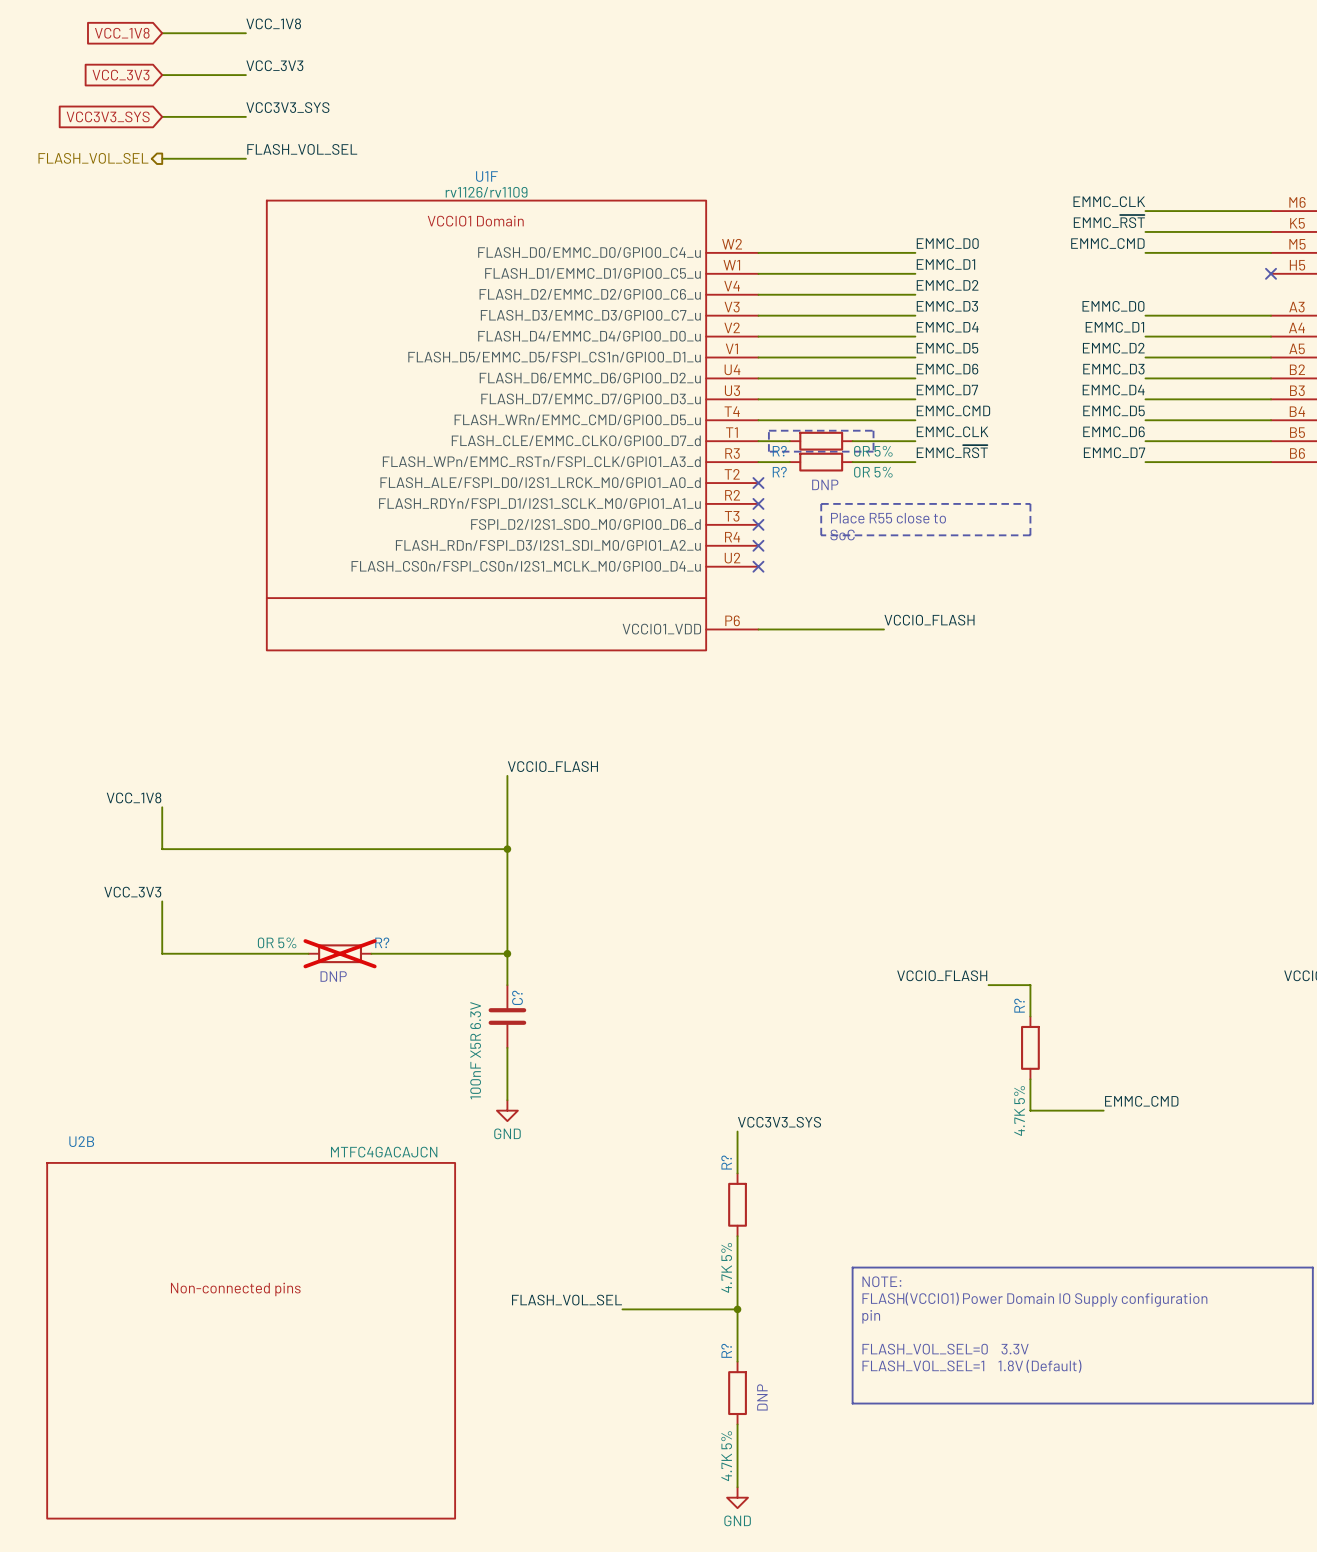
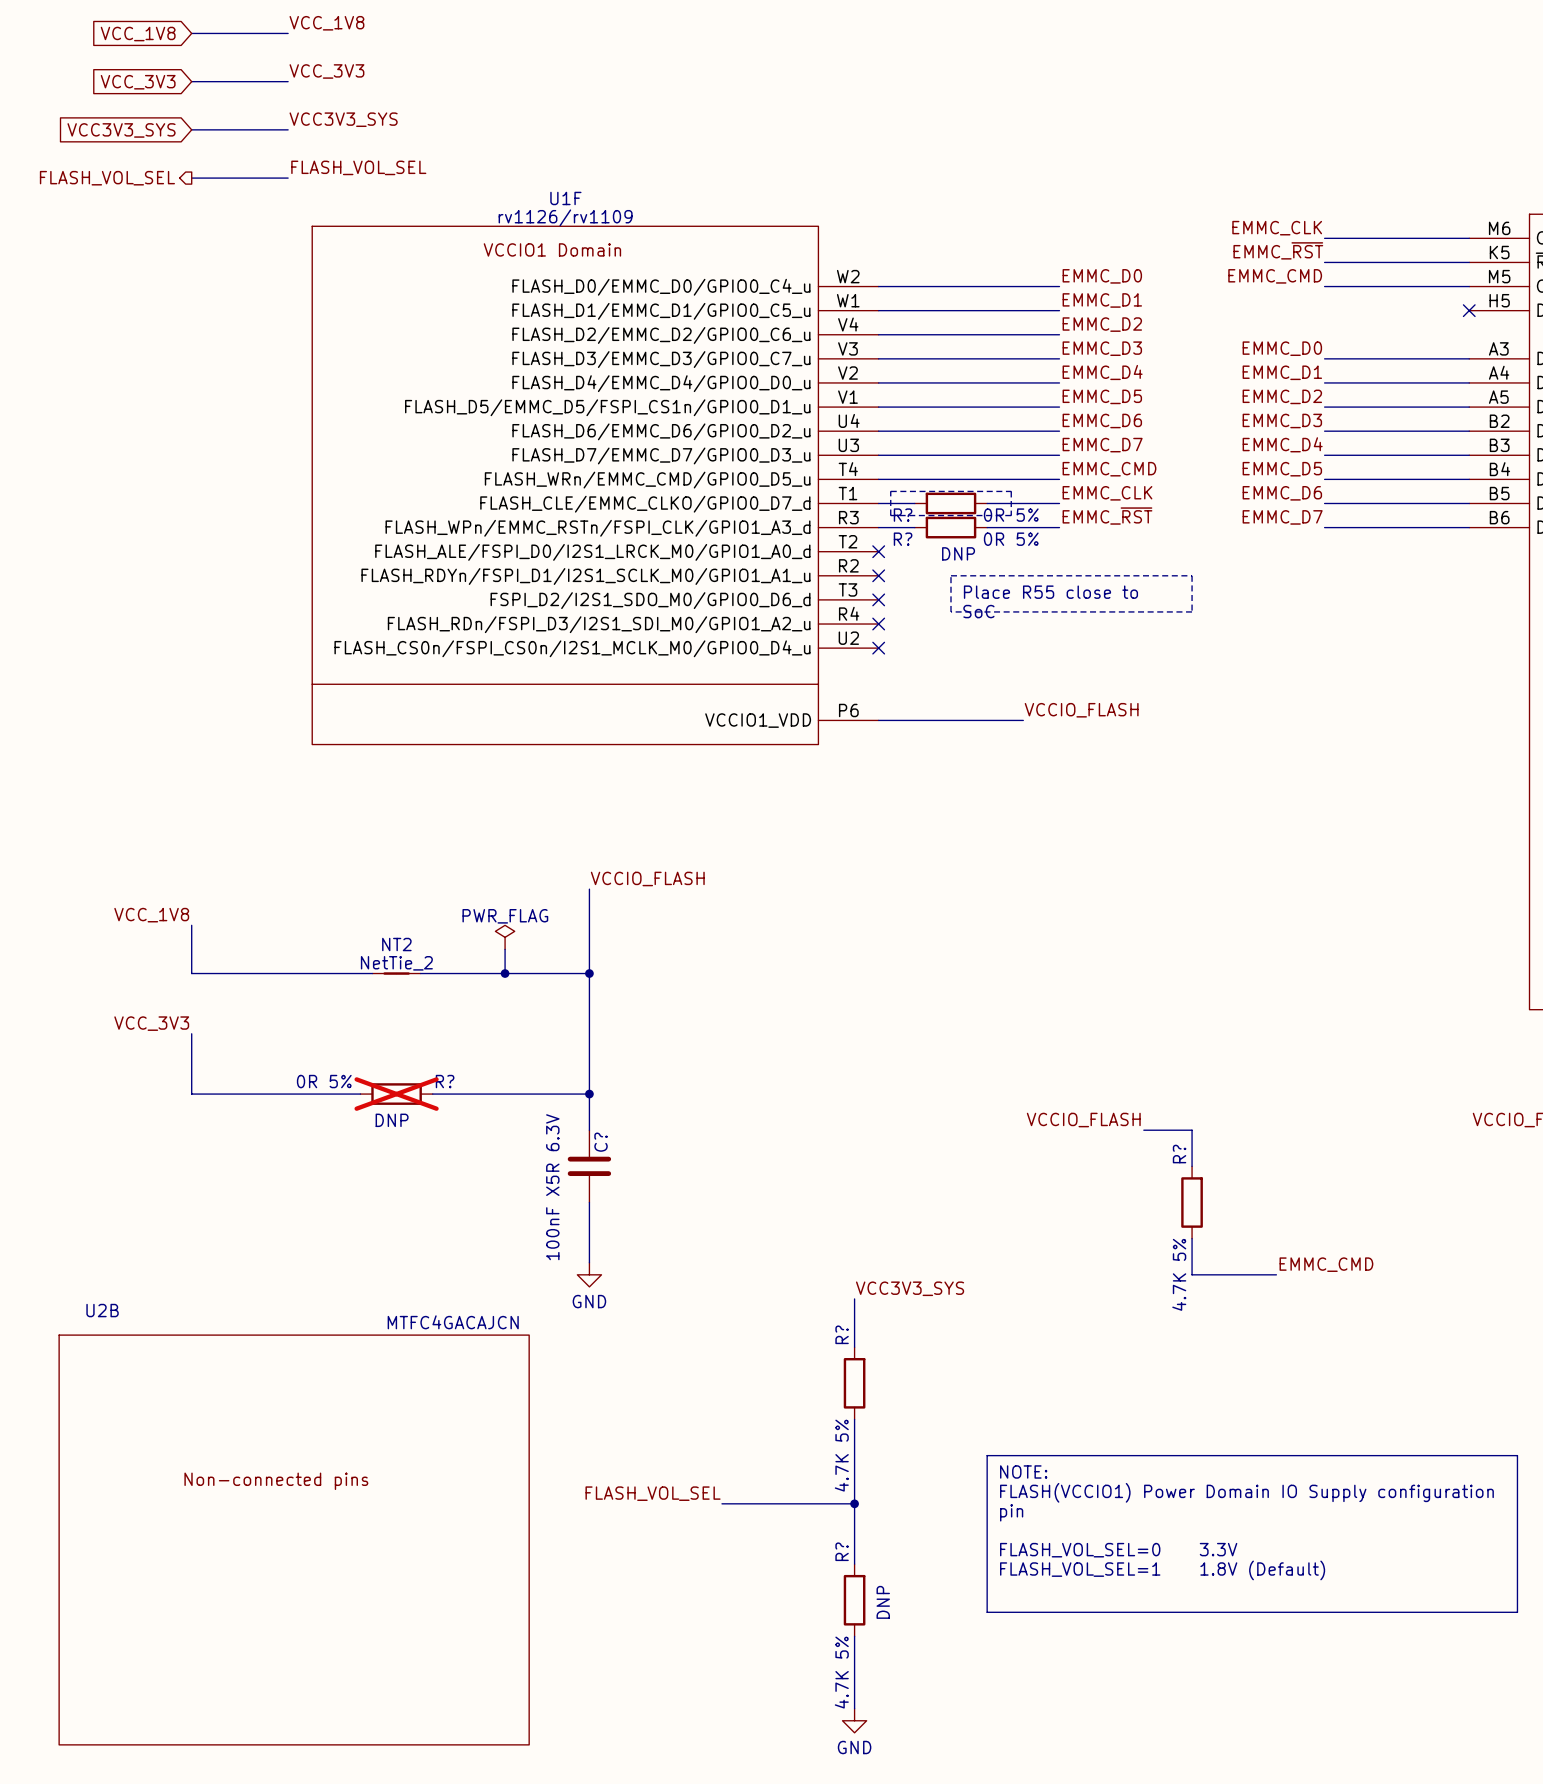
power symbol: none -> PWR_FLAG (505, 937)
wire: none -> (505, 949) (505, 973)
NT2: none -> NetTie_2 (396, 973)
junction: none -> (505, 973)

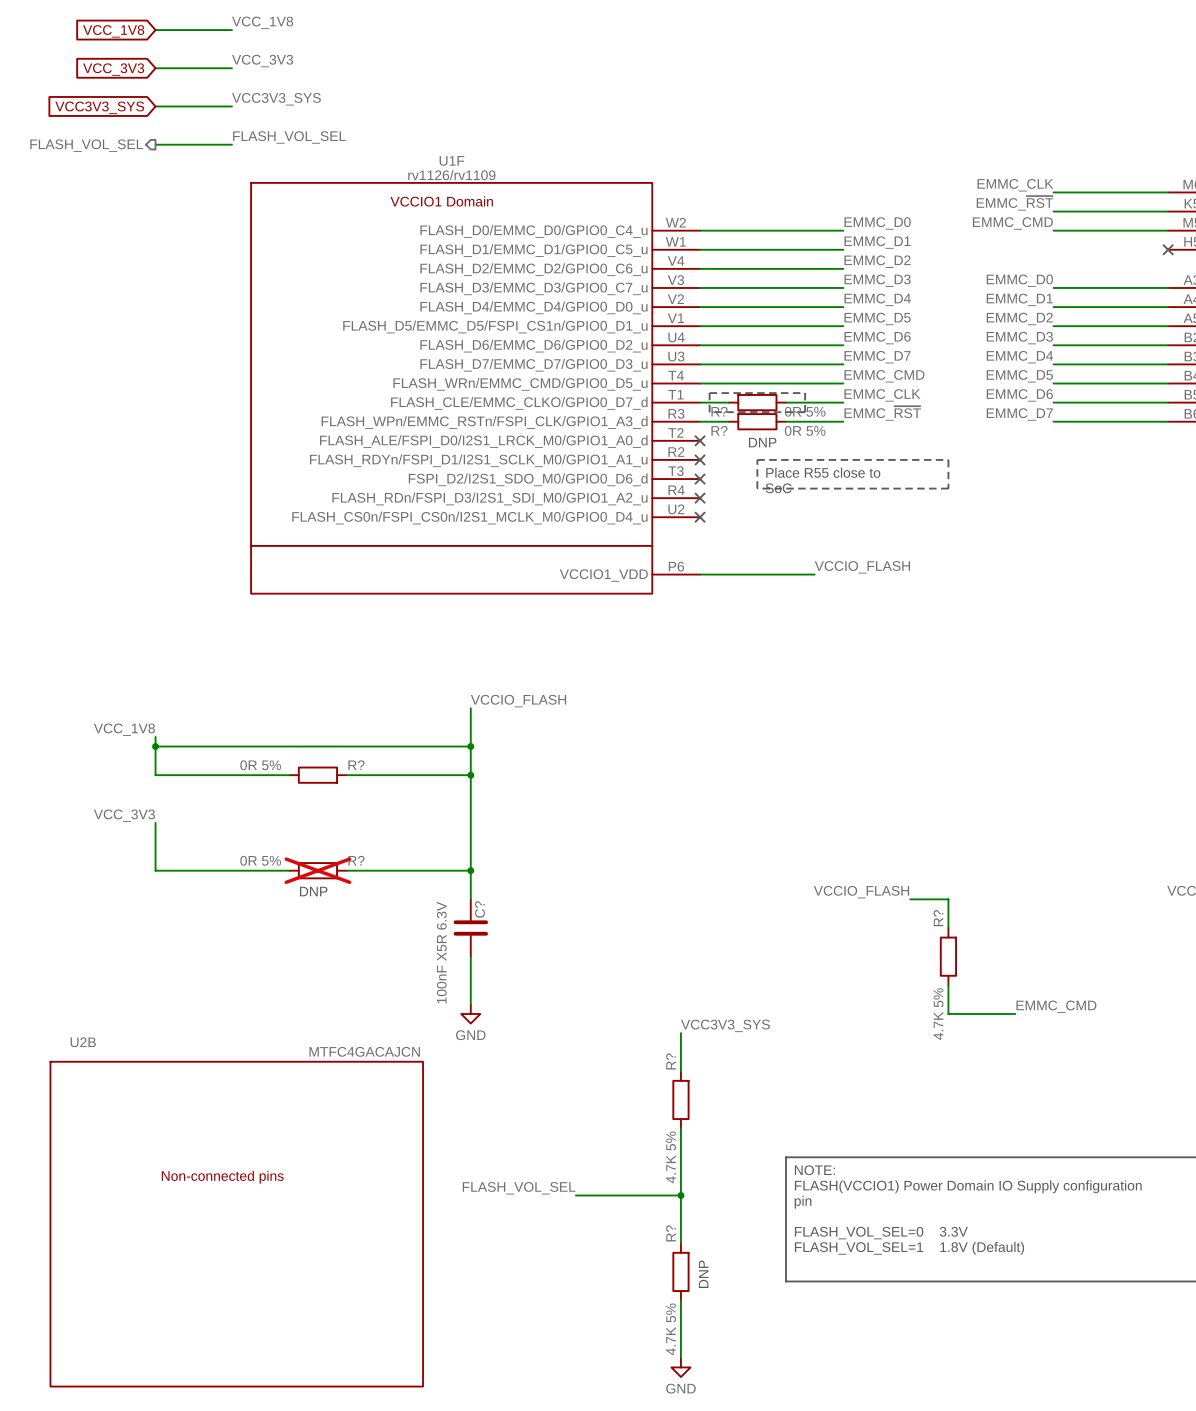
wire: none -> (155, 746) (470, 746)
junction: none -> (155, 746)
power symbol: PWR_FLAG (505, 937) -> none
junction: none -> (470, 746)
wire: (505, 949) (505, 973) -> none
NT2: NetTie_2 (396, 973) -> none
R?: none -> 0R 5% (317, 775)
junction: (505, 973) -> none

